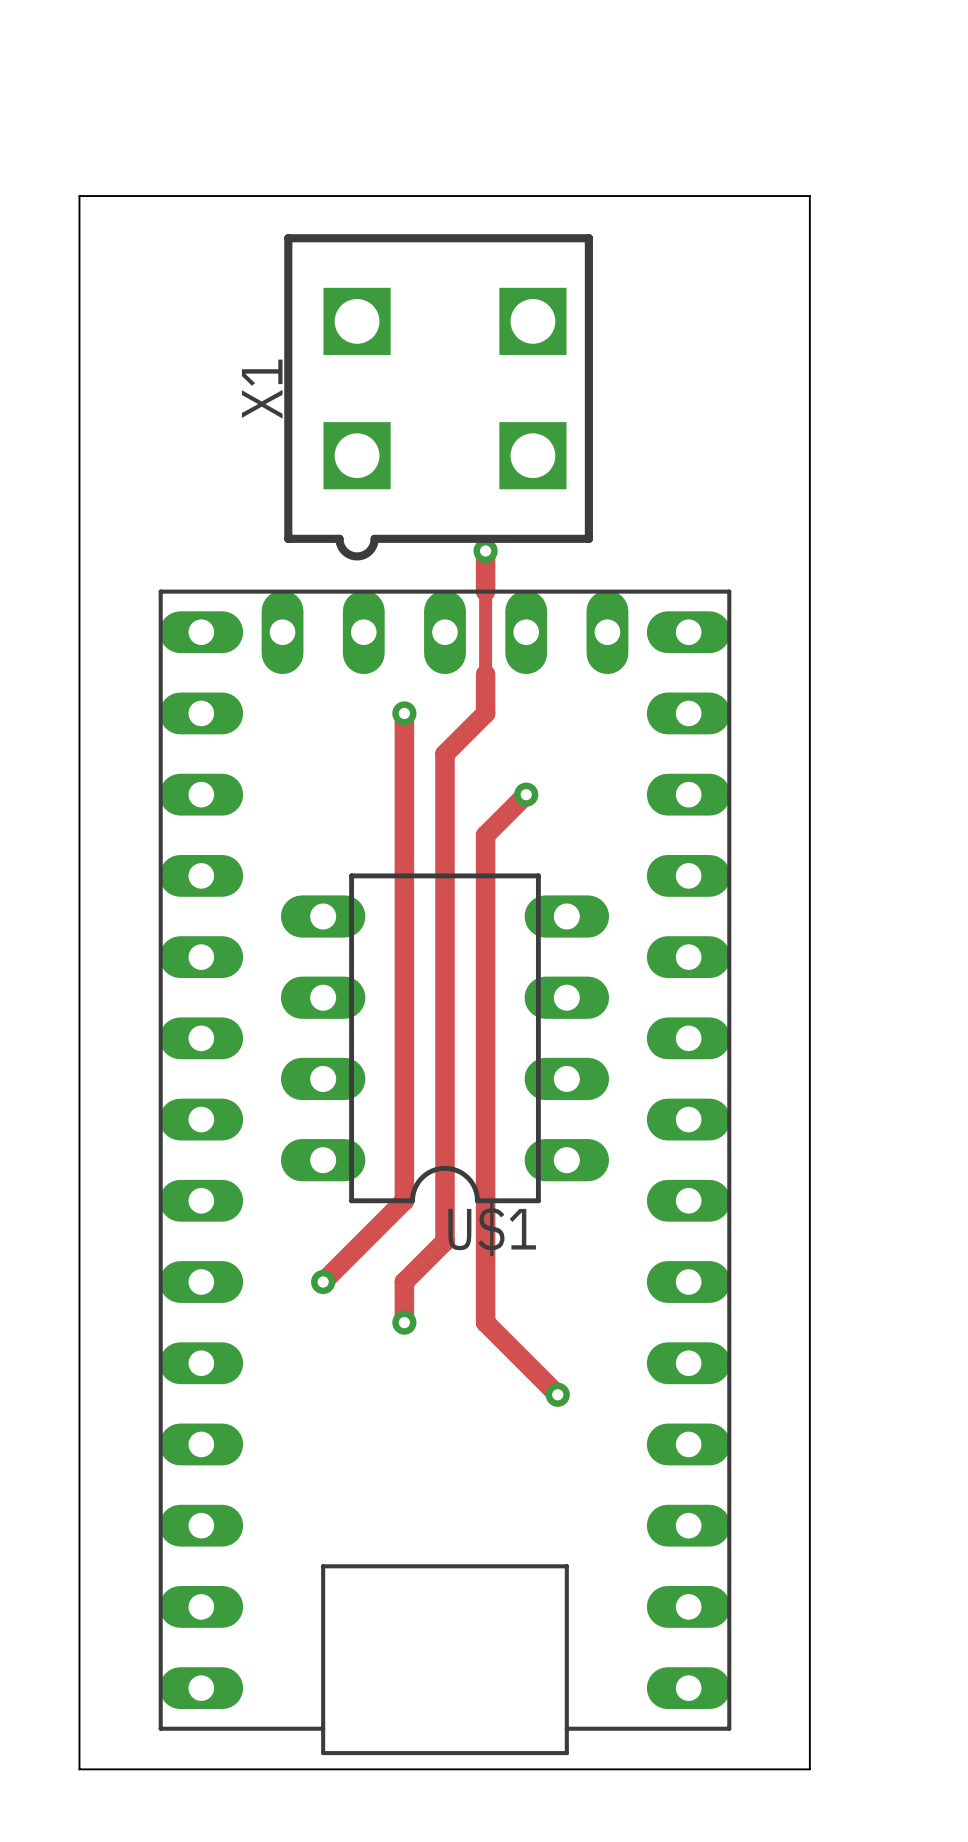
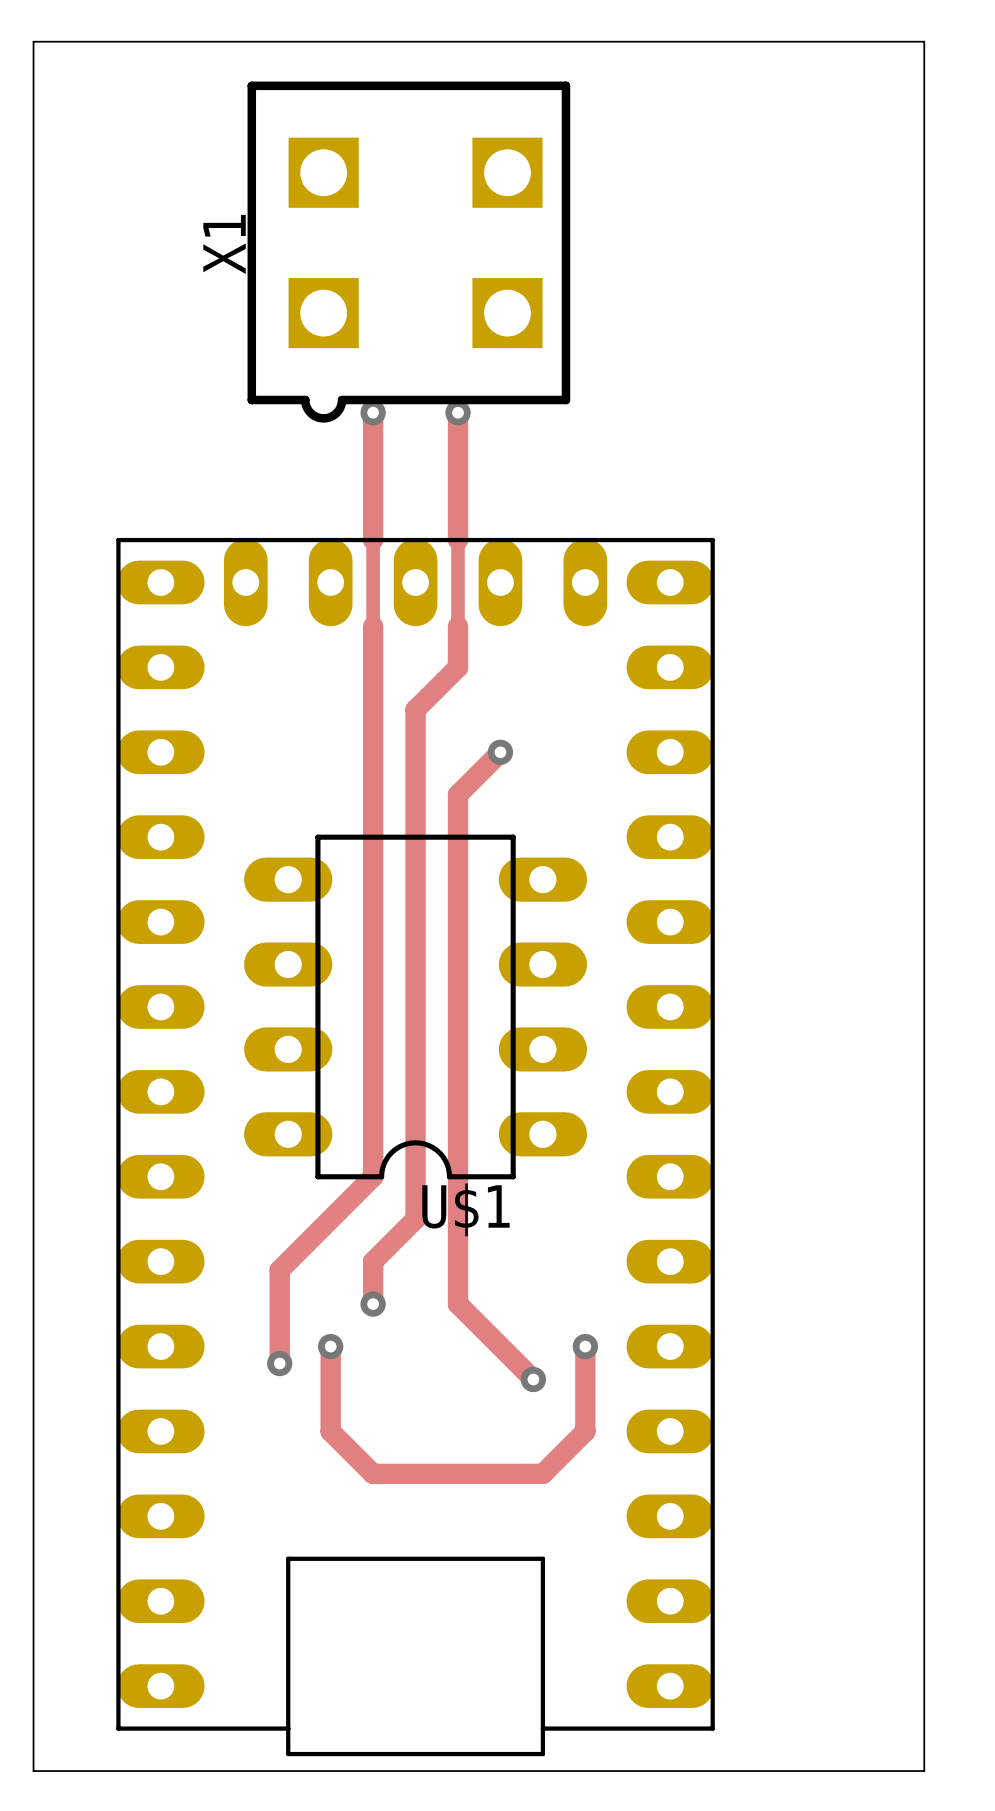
board edge: (79, 196) (809, 196) (809, 1769) -> (33, 126) (33, 41) (924, 41) (924, 1771) (796, 1771)
X1 position: (438, 397) -> (408, 252)
track: none -> (373, 412) (373, 667)
via: none -> (373, 412)
track: none -> (458, 412) (458, 497)
via: none -> (458, 412)
via: (485, 550) -> none
via: (404, 713) -> none
track: none -> (288, 1261) (279, 1270) (279, 1363)
via: (323, 1282) -> none
track: none -> (330, 1346) (330, 1431) (373, 1473) (542, 1473) (585, 1431) (585, 1346)
via: none -> (330, 1346)
via: none -> (585, 1346)
via: none -> (279, 1363)

